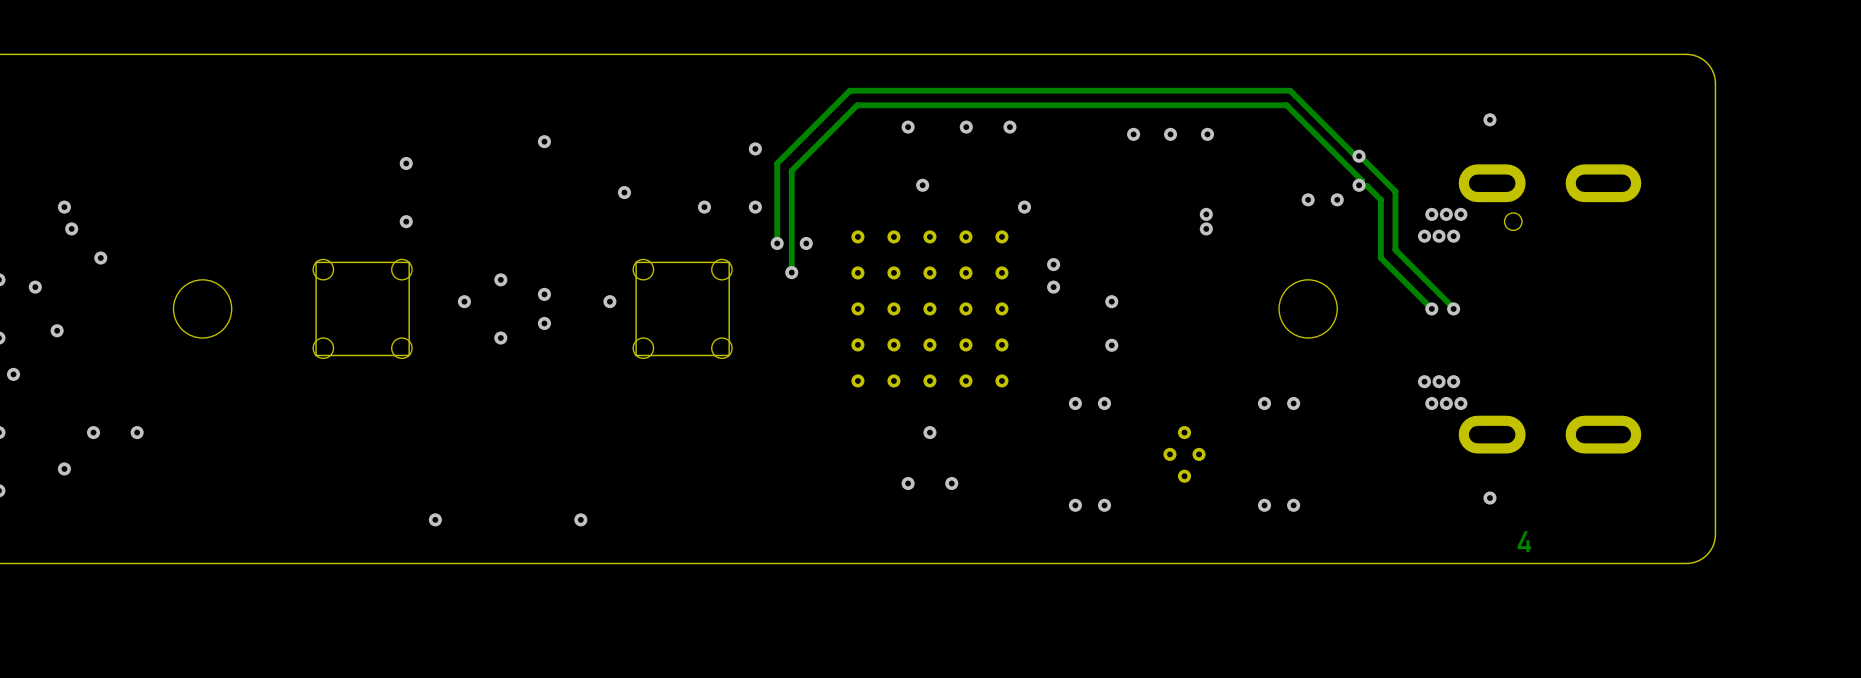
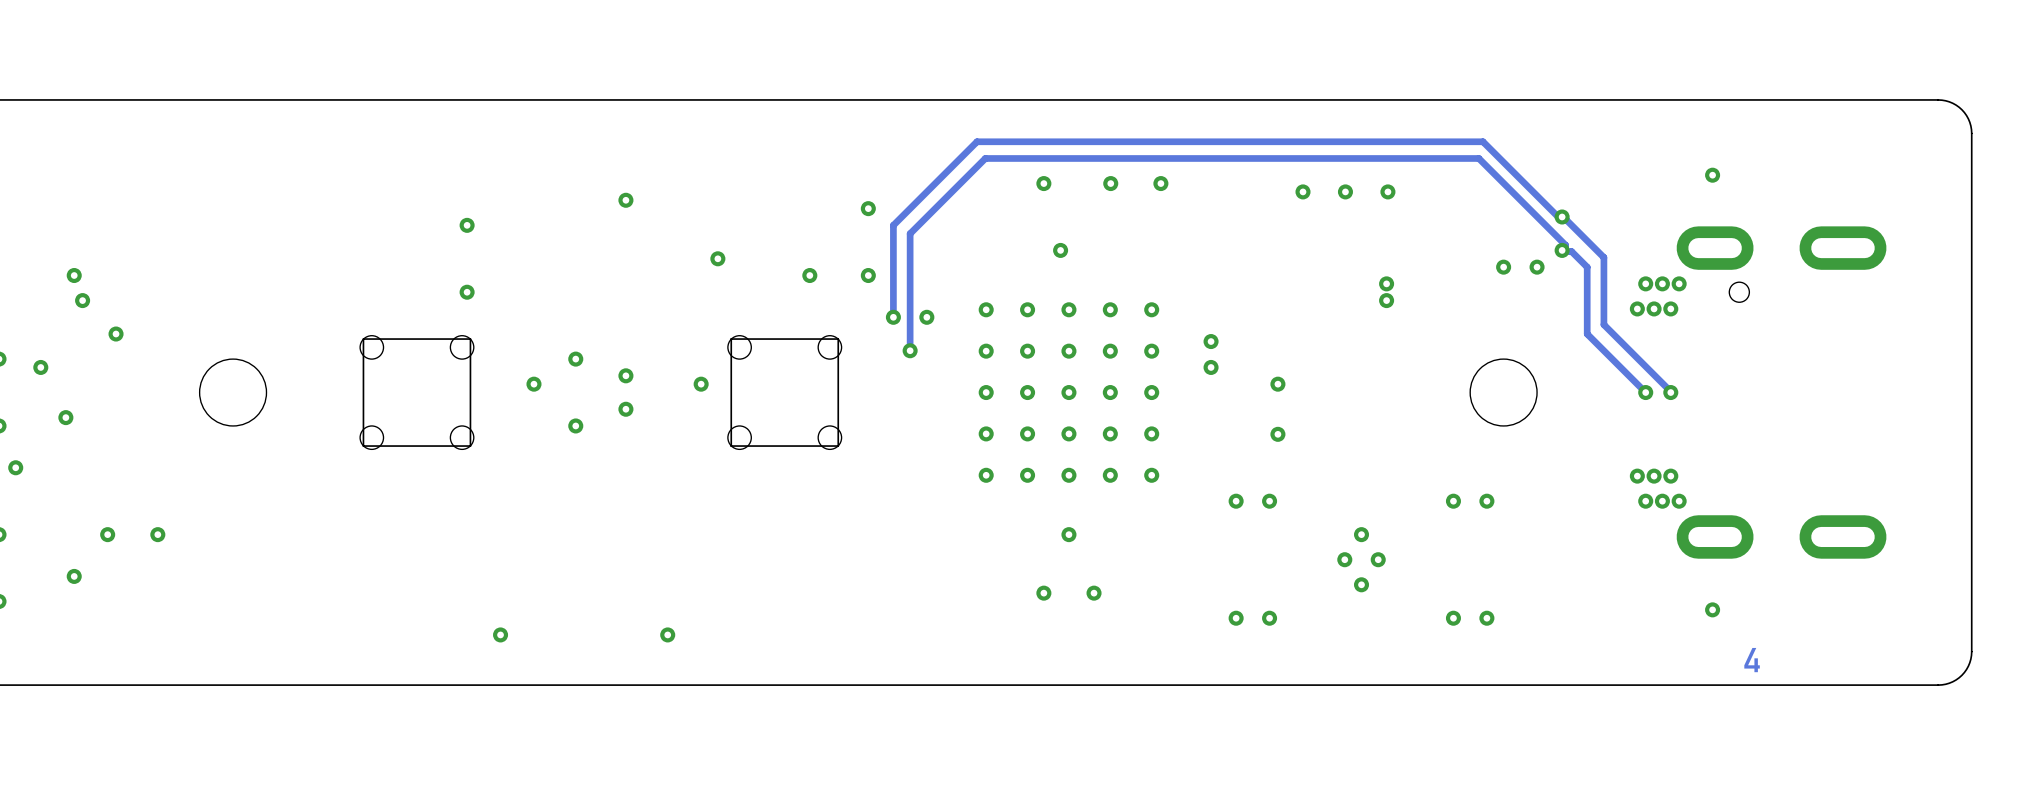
via: (1024, 207) -> none

